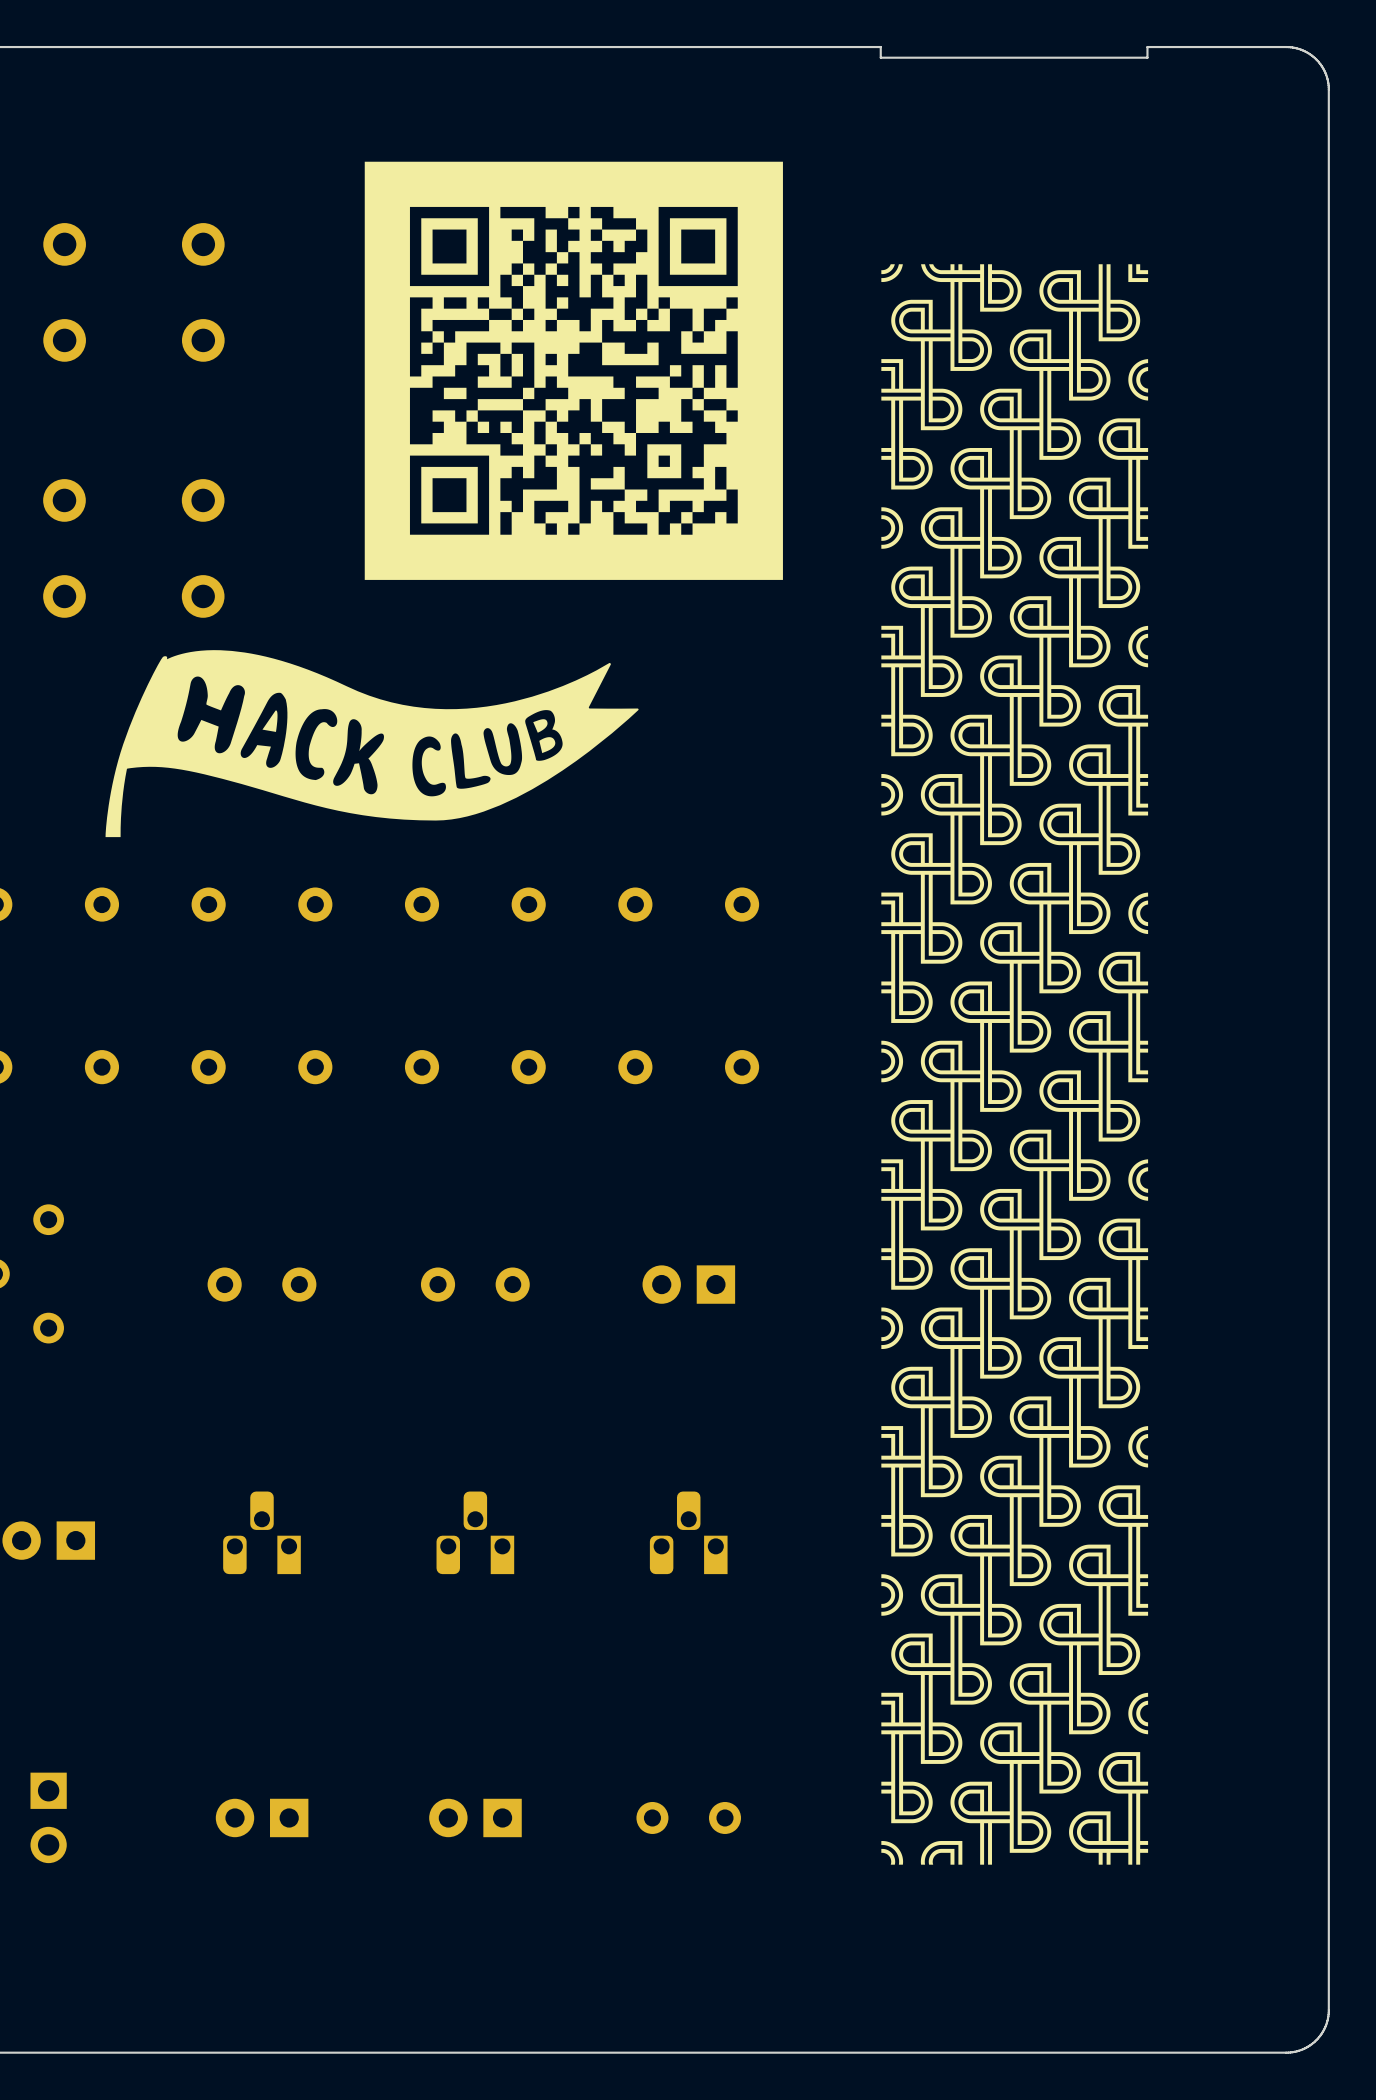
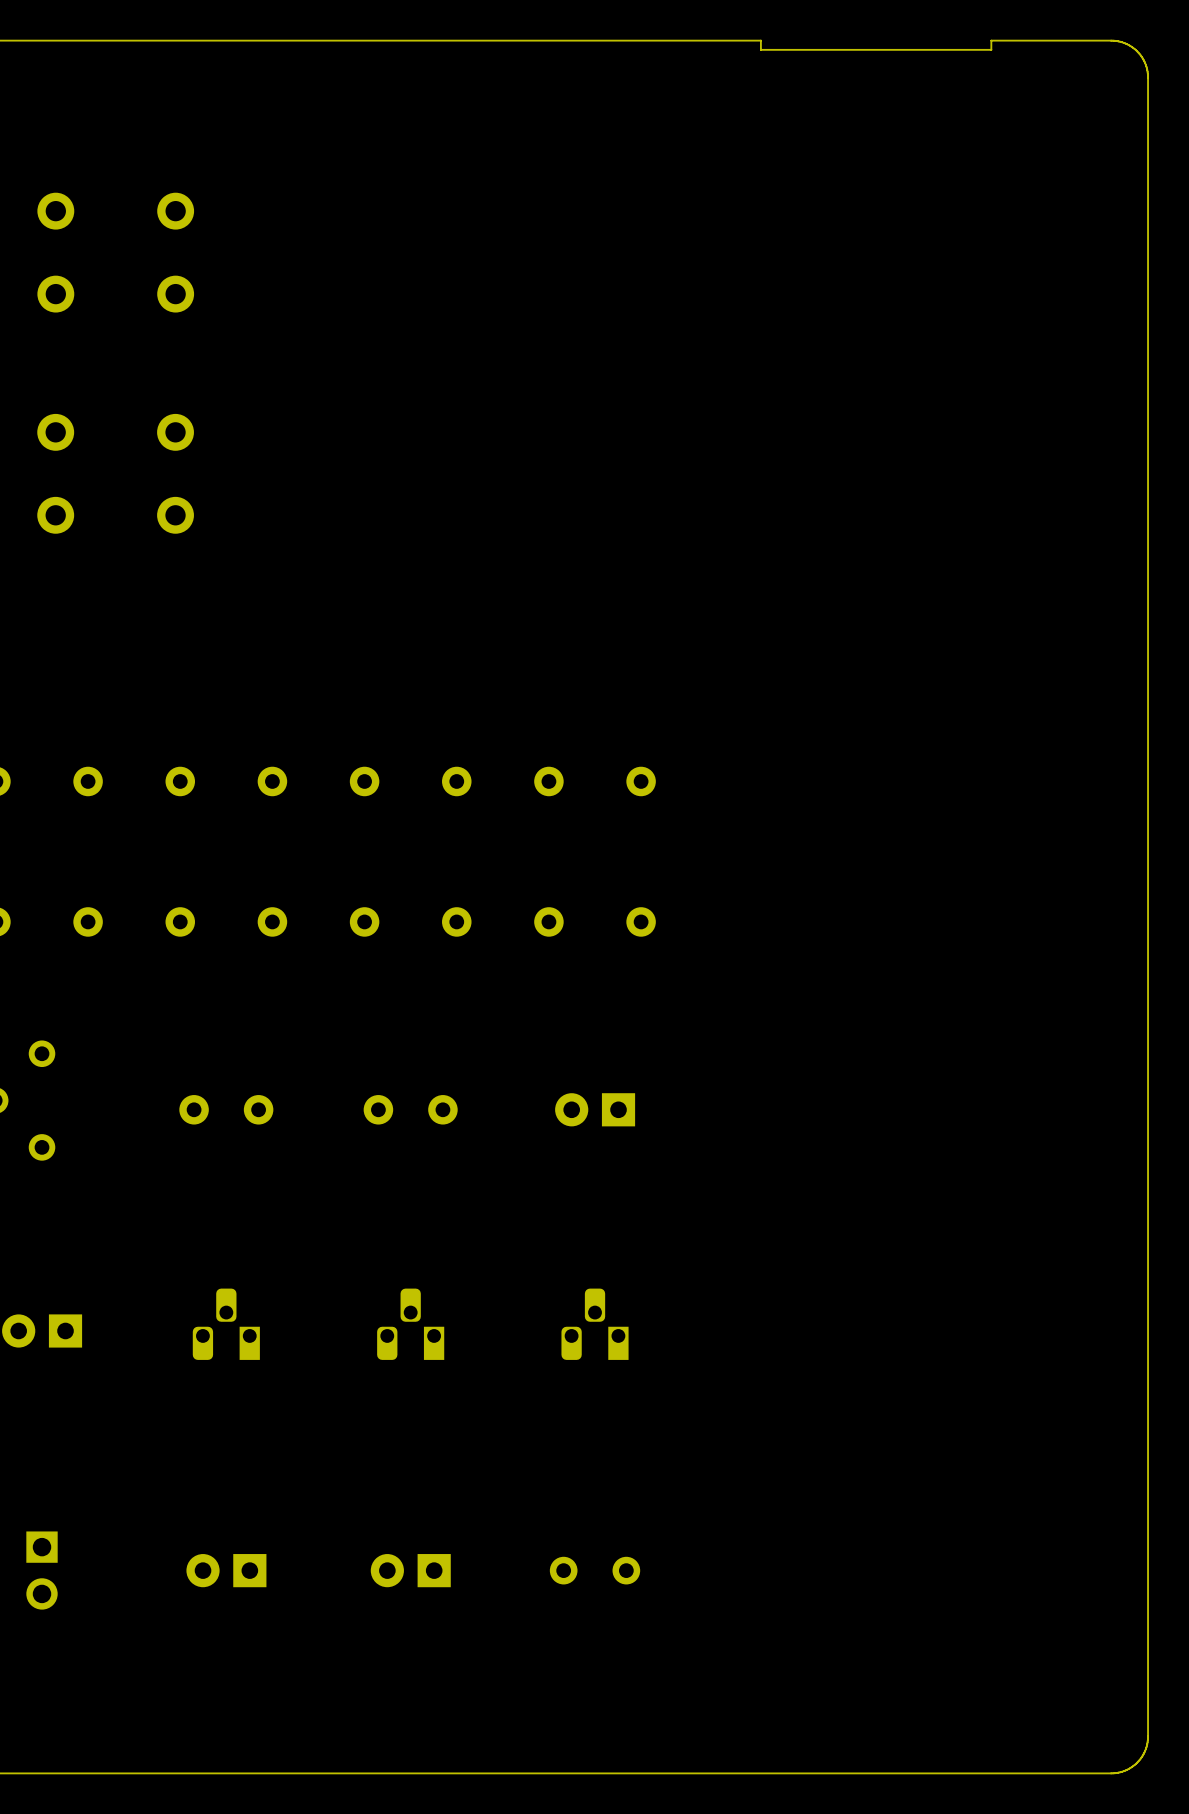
drawing: [364, 161, 783, 580] -> none
drawing: [881, 264, 1149, 1865] -> none
drawing: [105, 650, 639, 838] -> none

